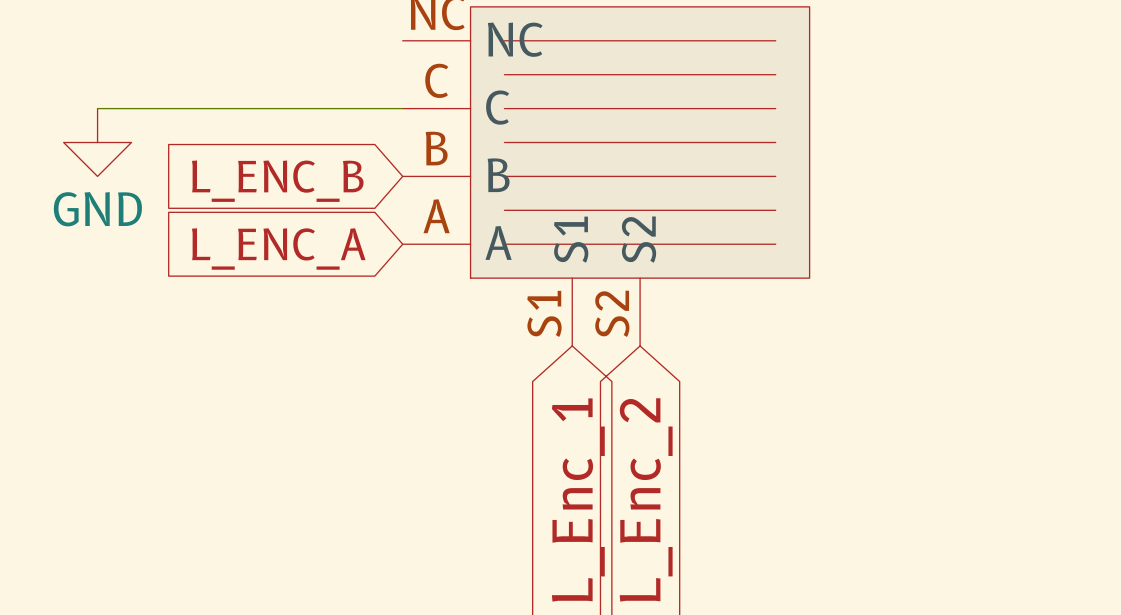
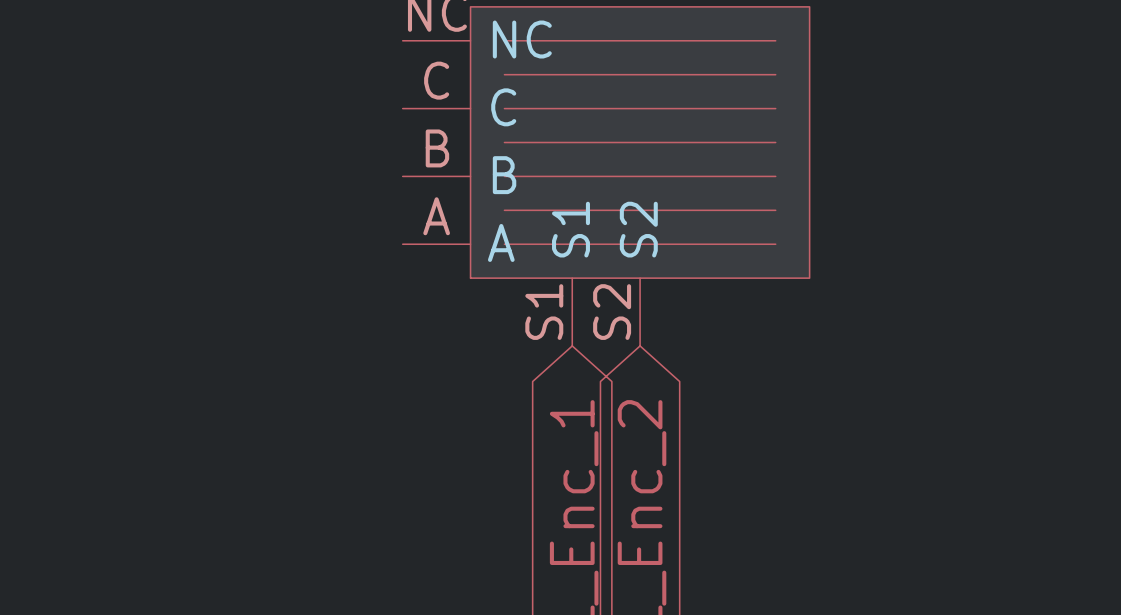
wire: (97, 108) (402, 108) -> none
power symbol: GND (97, 142) -> none
global label: L_ENC_B (277, 181) -> none
global label: L_ENC_A (278, 249) -> none

